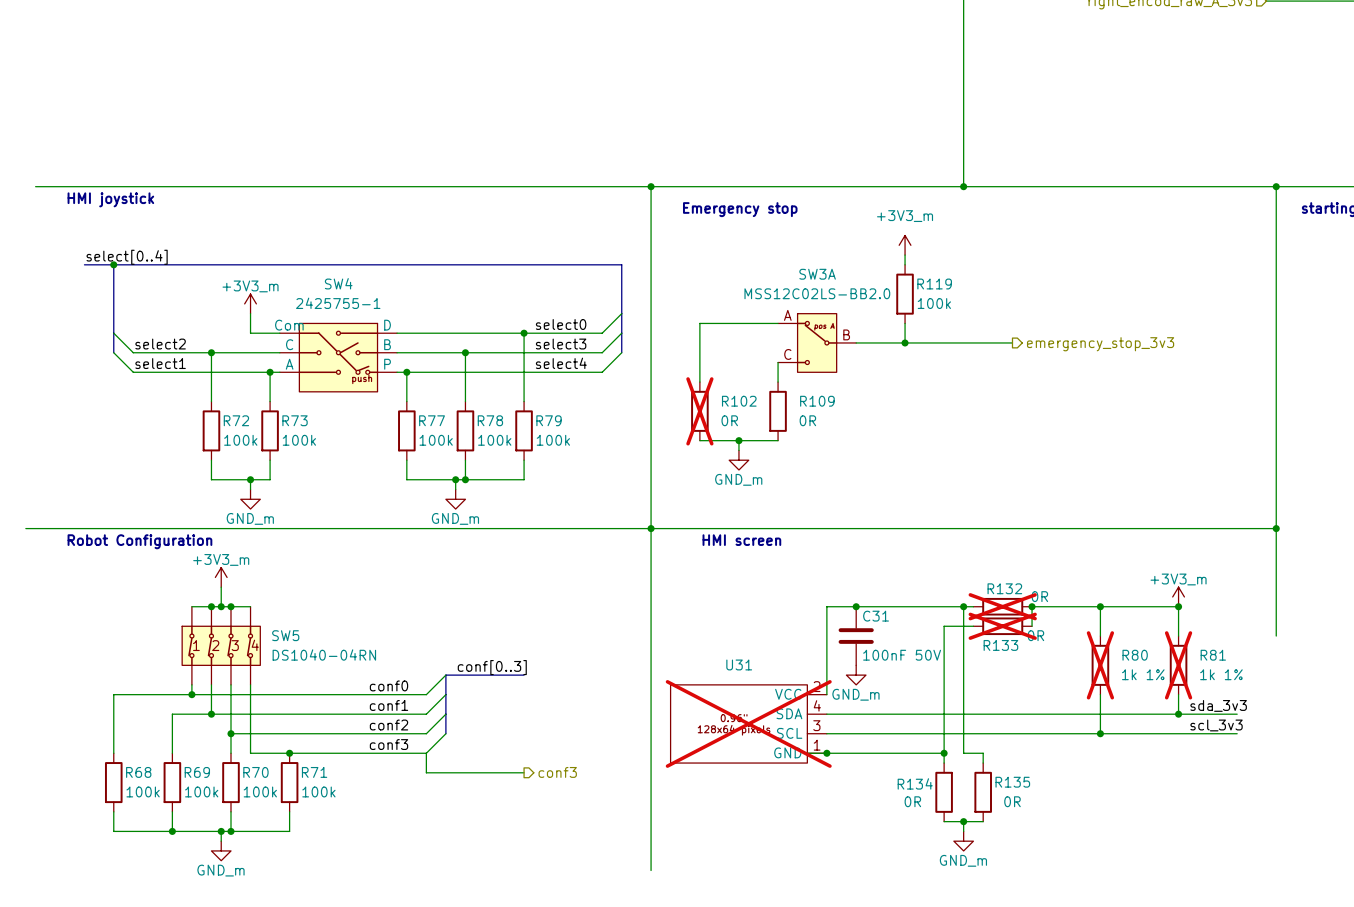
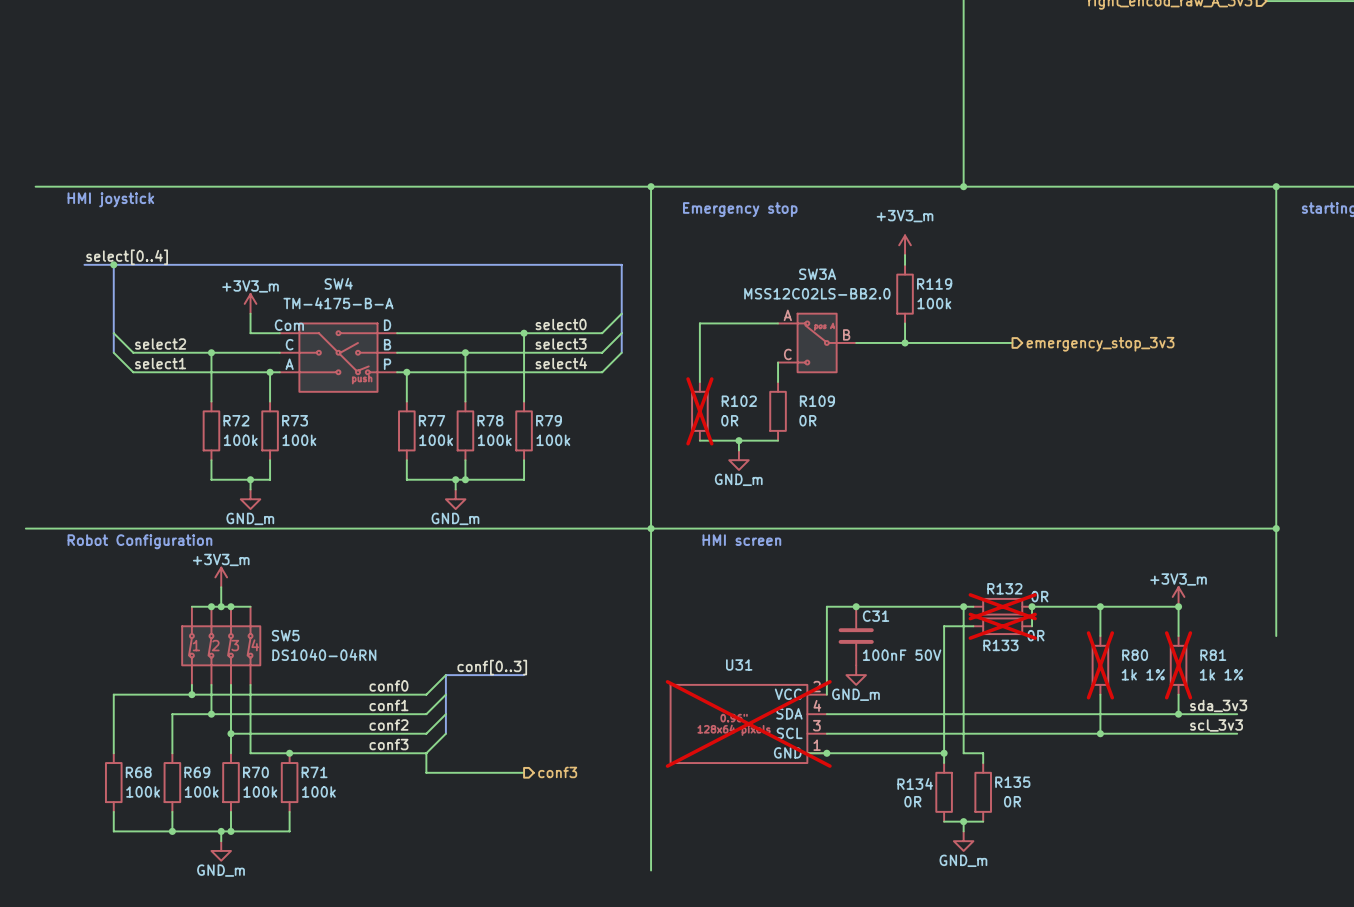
SW4 value: 2425755-1 (338, 303) -> TM-4175-B-A (338, 303)

